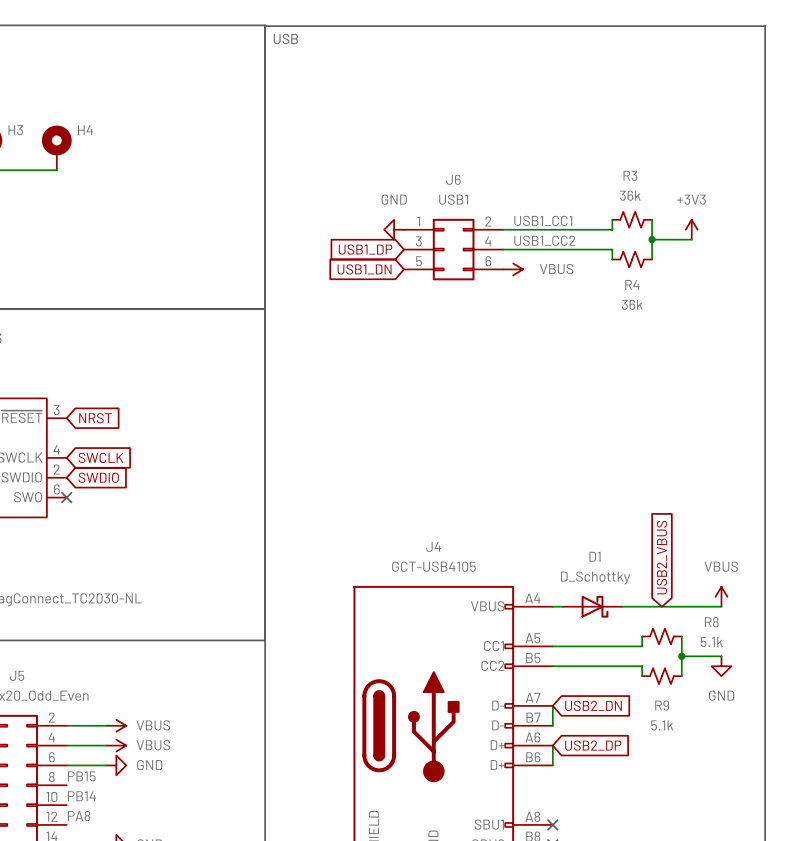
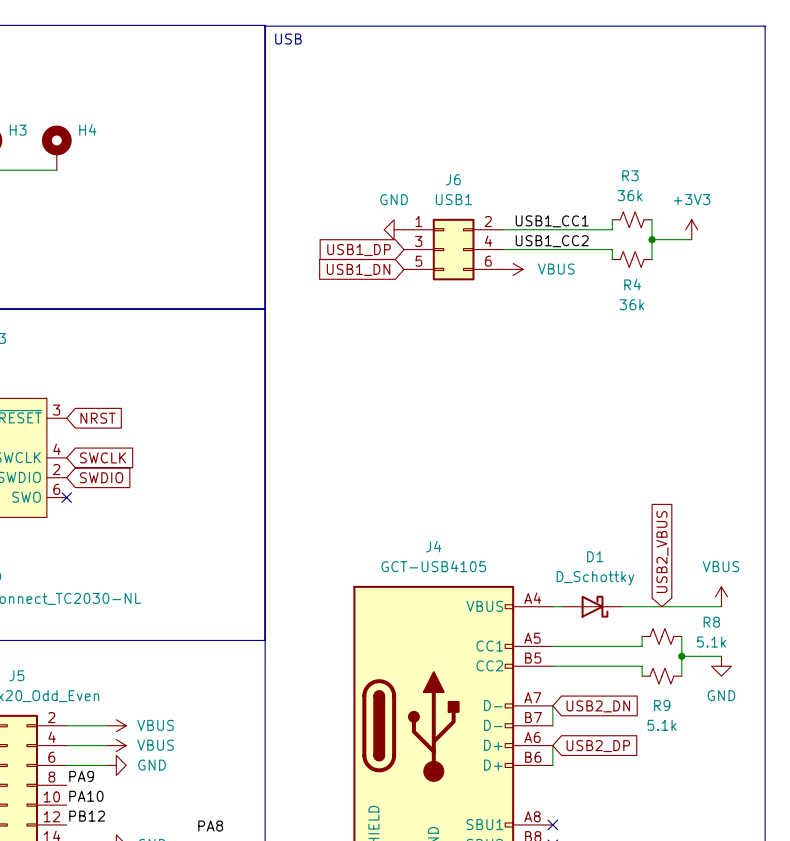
label: PB15 (81, 776) -> PA9 (81, 776)
label: PB14 (81, 796) -> PA10 (86, 796)
label: PA8 (79, 816) -> PB12 (87, 816)
label: none -> PA8 (210, 826)

